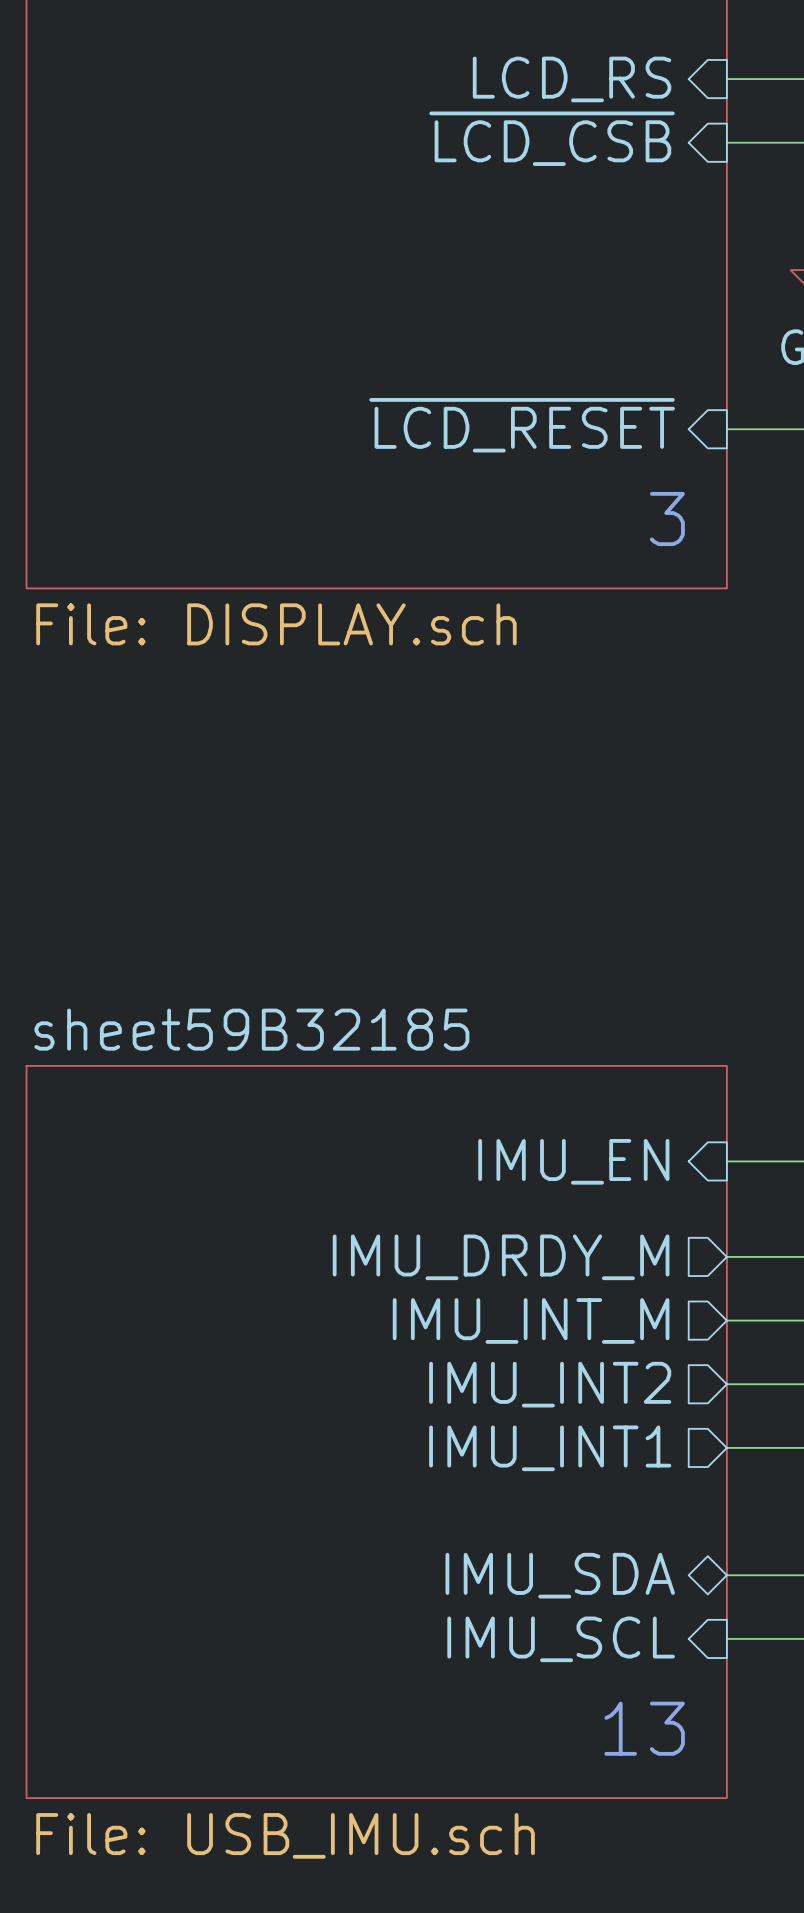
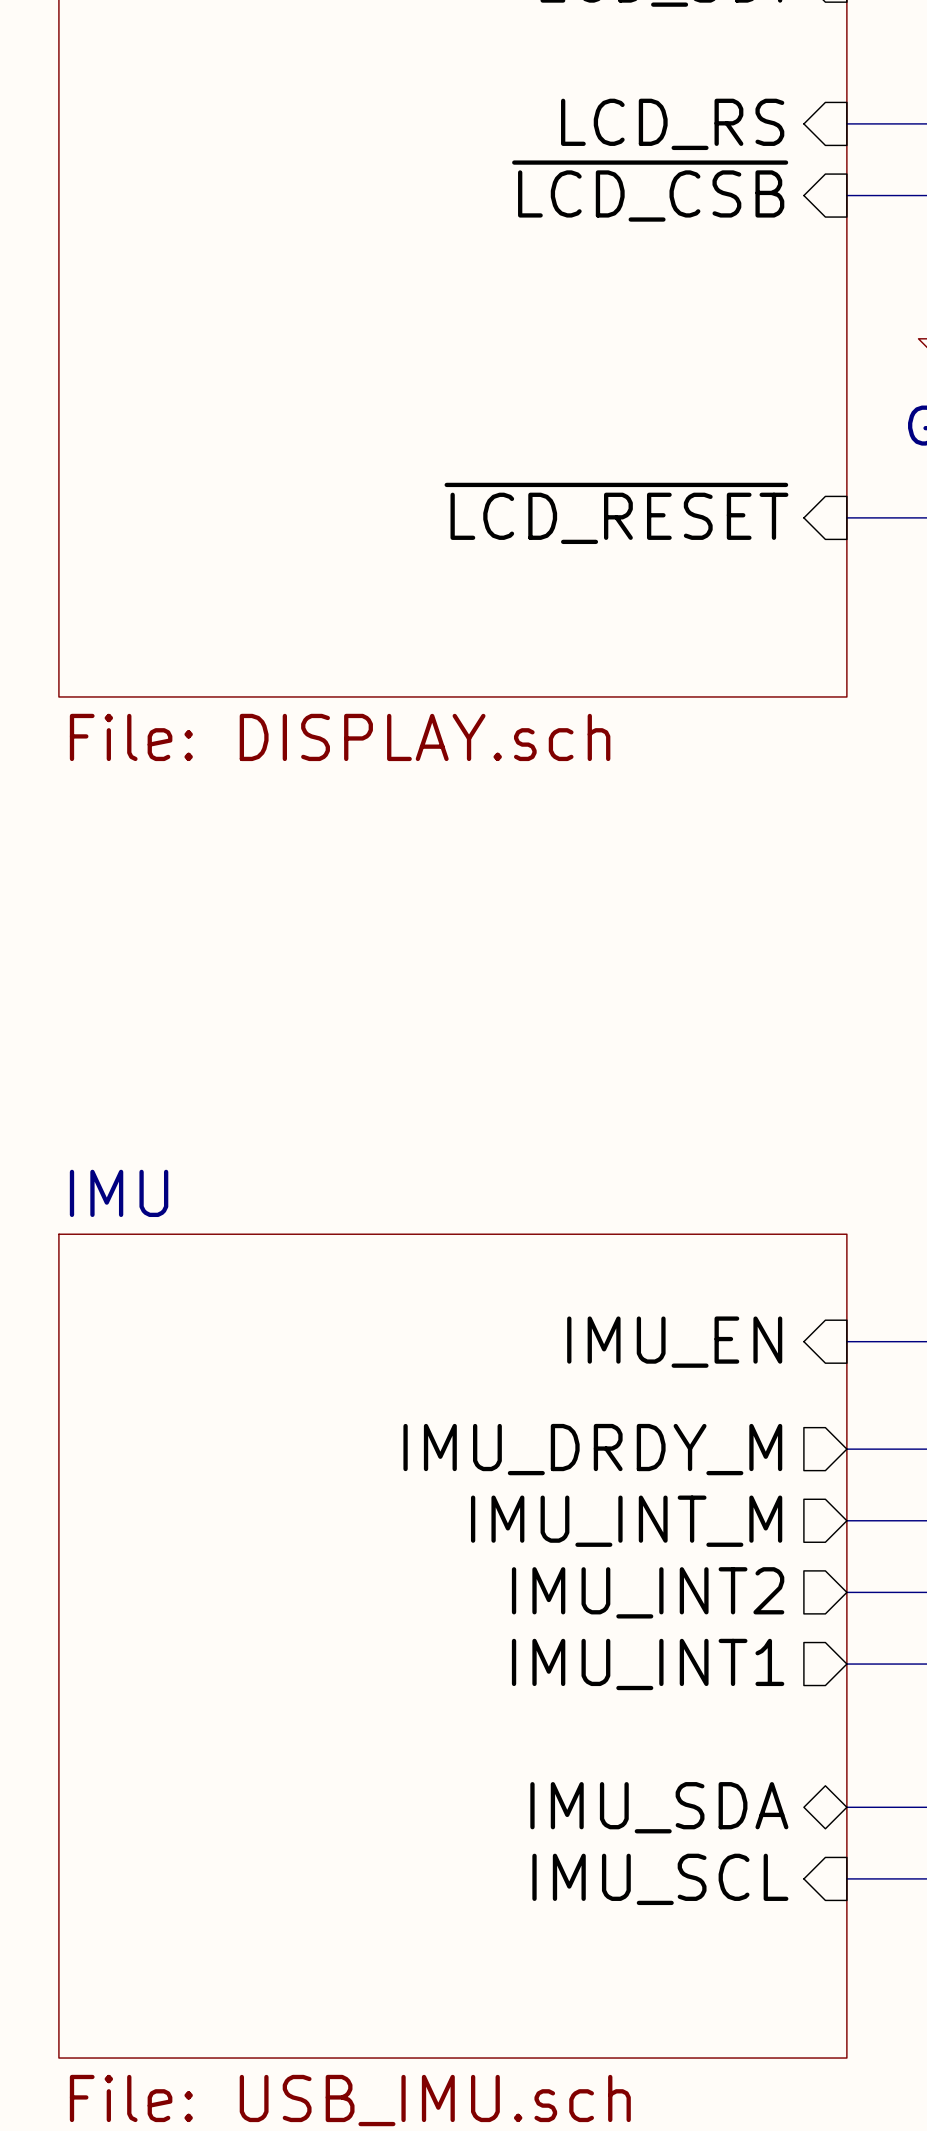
text: 3 (667, 519) -> none
sheet sheet59B32185 name: sheet59B32185 (251, 1029) -> IMU (119, 1193)
text: 13 (644, 1728) -> none

